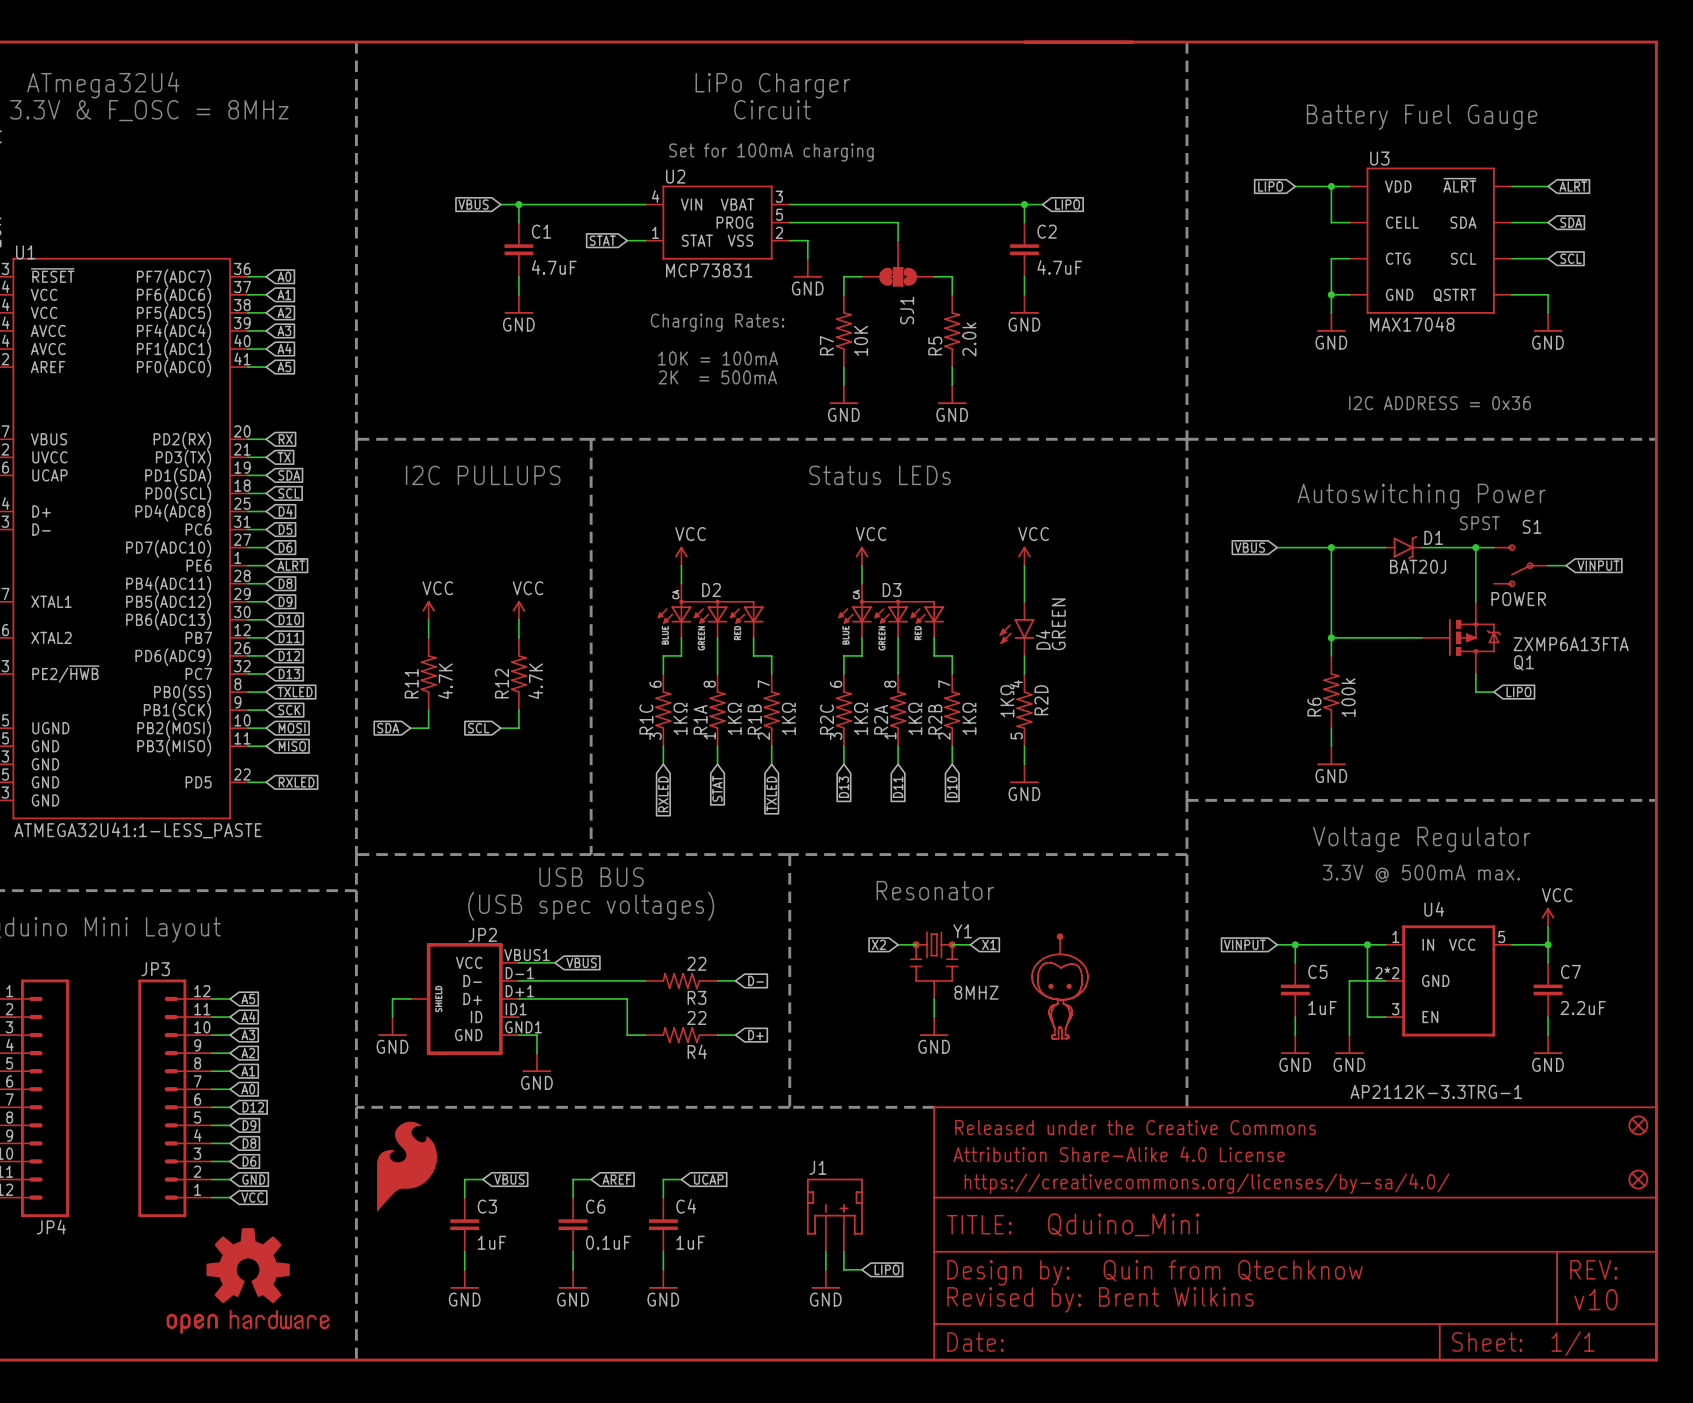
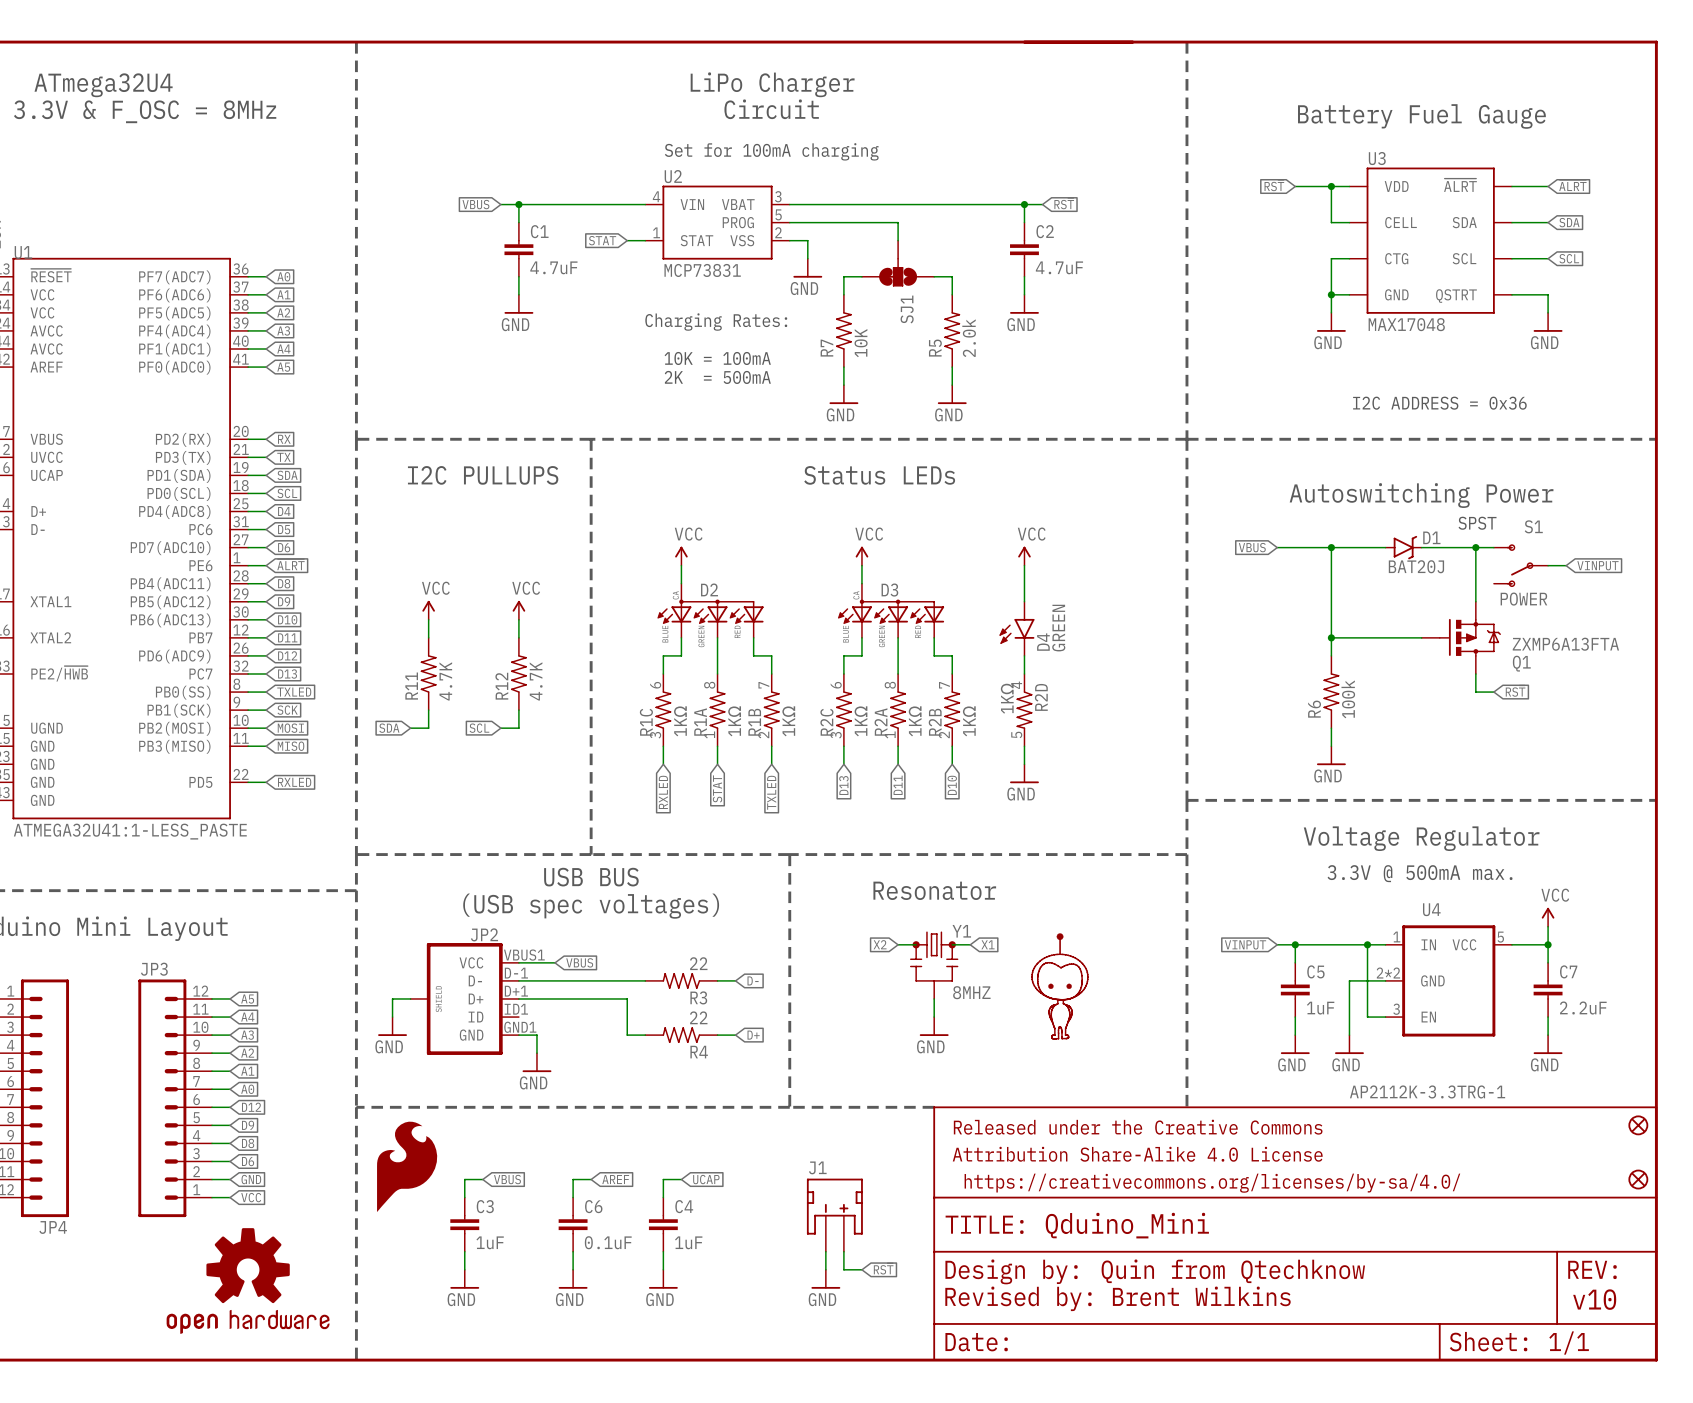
global label: LIPO (1270, 186) -> RS~{T} (1274, 185)
global label: LIPO (1067, 204) -> RS~{T} (1064, 203)
global label: LIPO (1518, 692) -> RS~{T} (1515, 691)
global label: LIPO (887, 1269) -> RS~{T} (883, 1268)

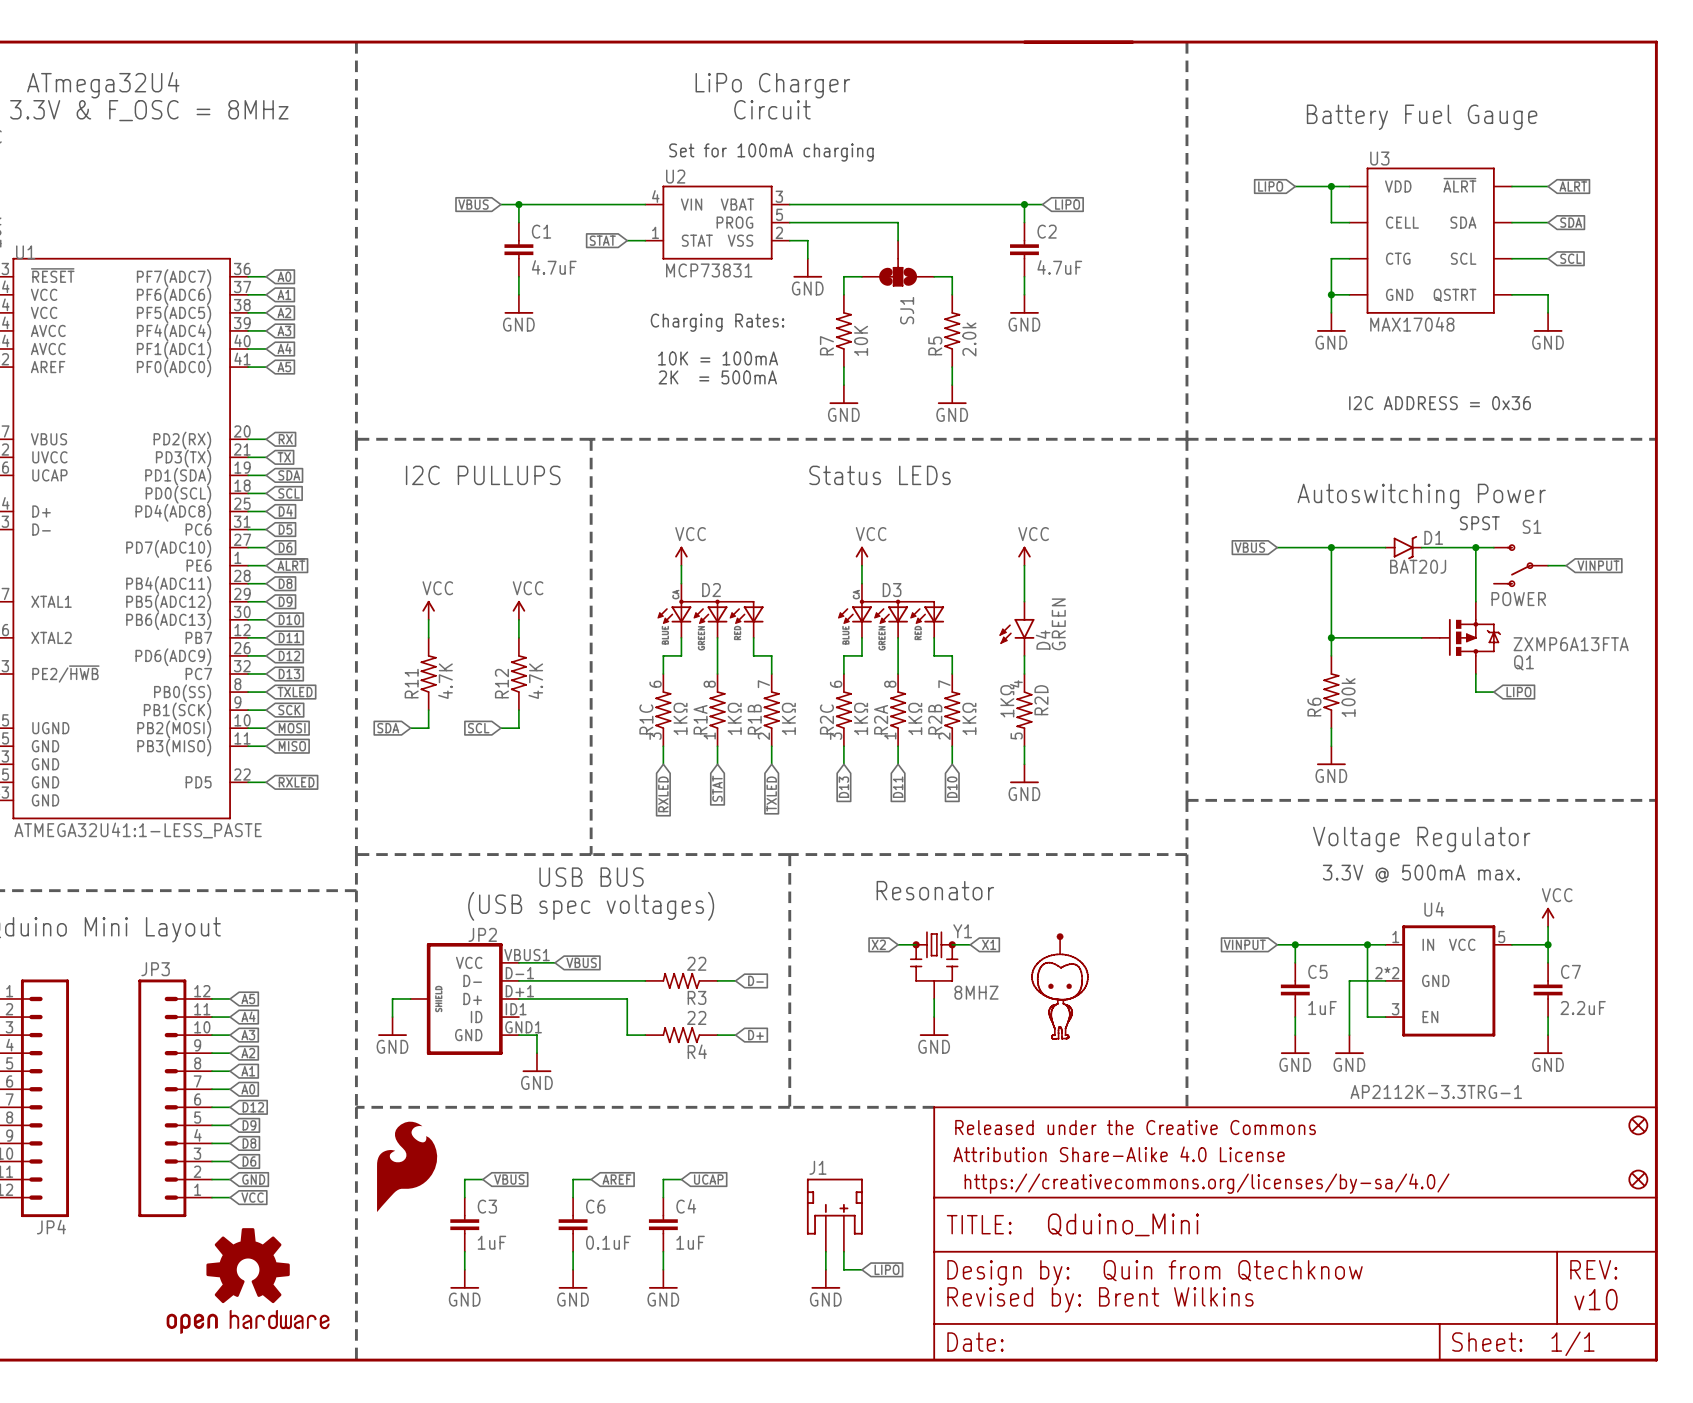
global label: RS~{T} (1274, 185) -> LIPO (1270, 186)
global label: RS~{T} (1064, 203) -> LIPO (1067, 204)
global label: RS~{T} (1515, 691) -> LIPO (1518, 692)
global label: RS~{T} (883, 1268) -> LIPO (887, 1269)

